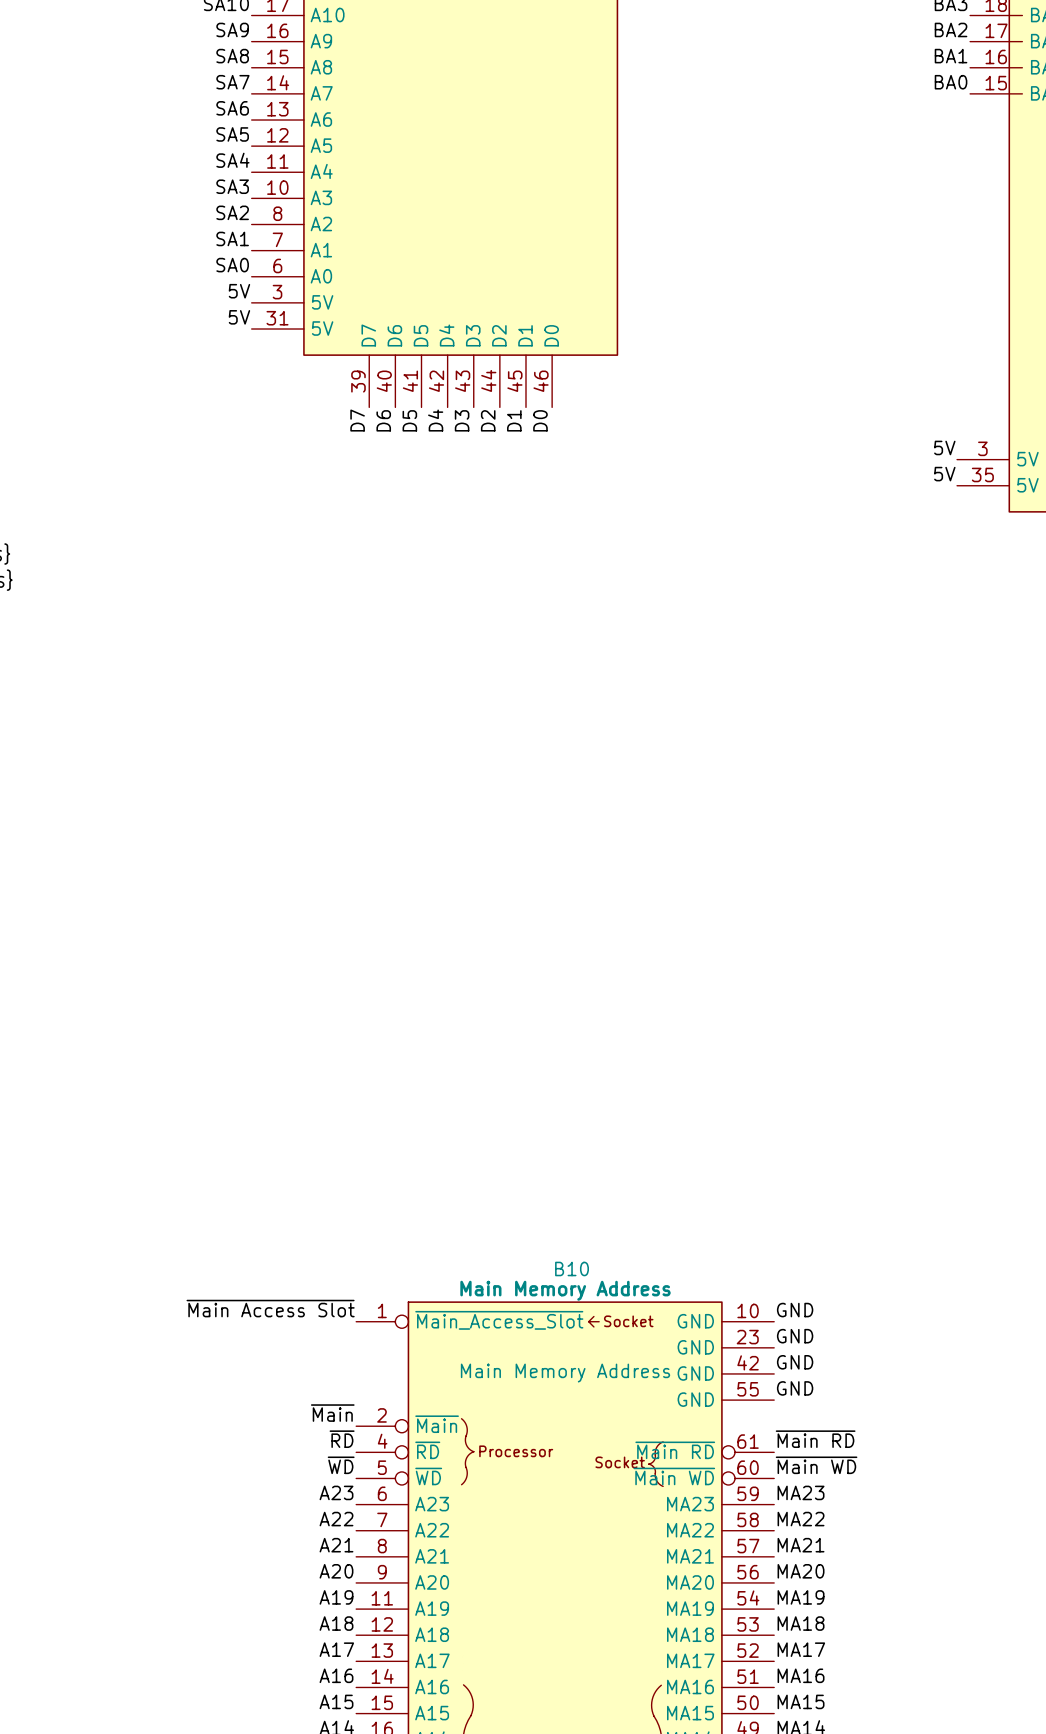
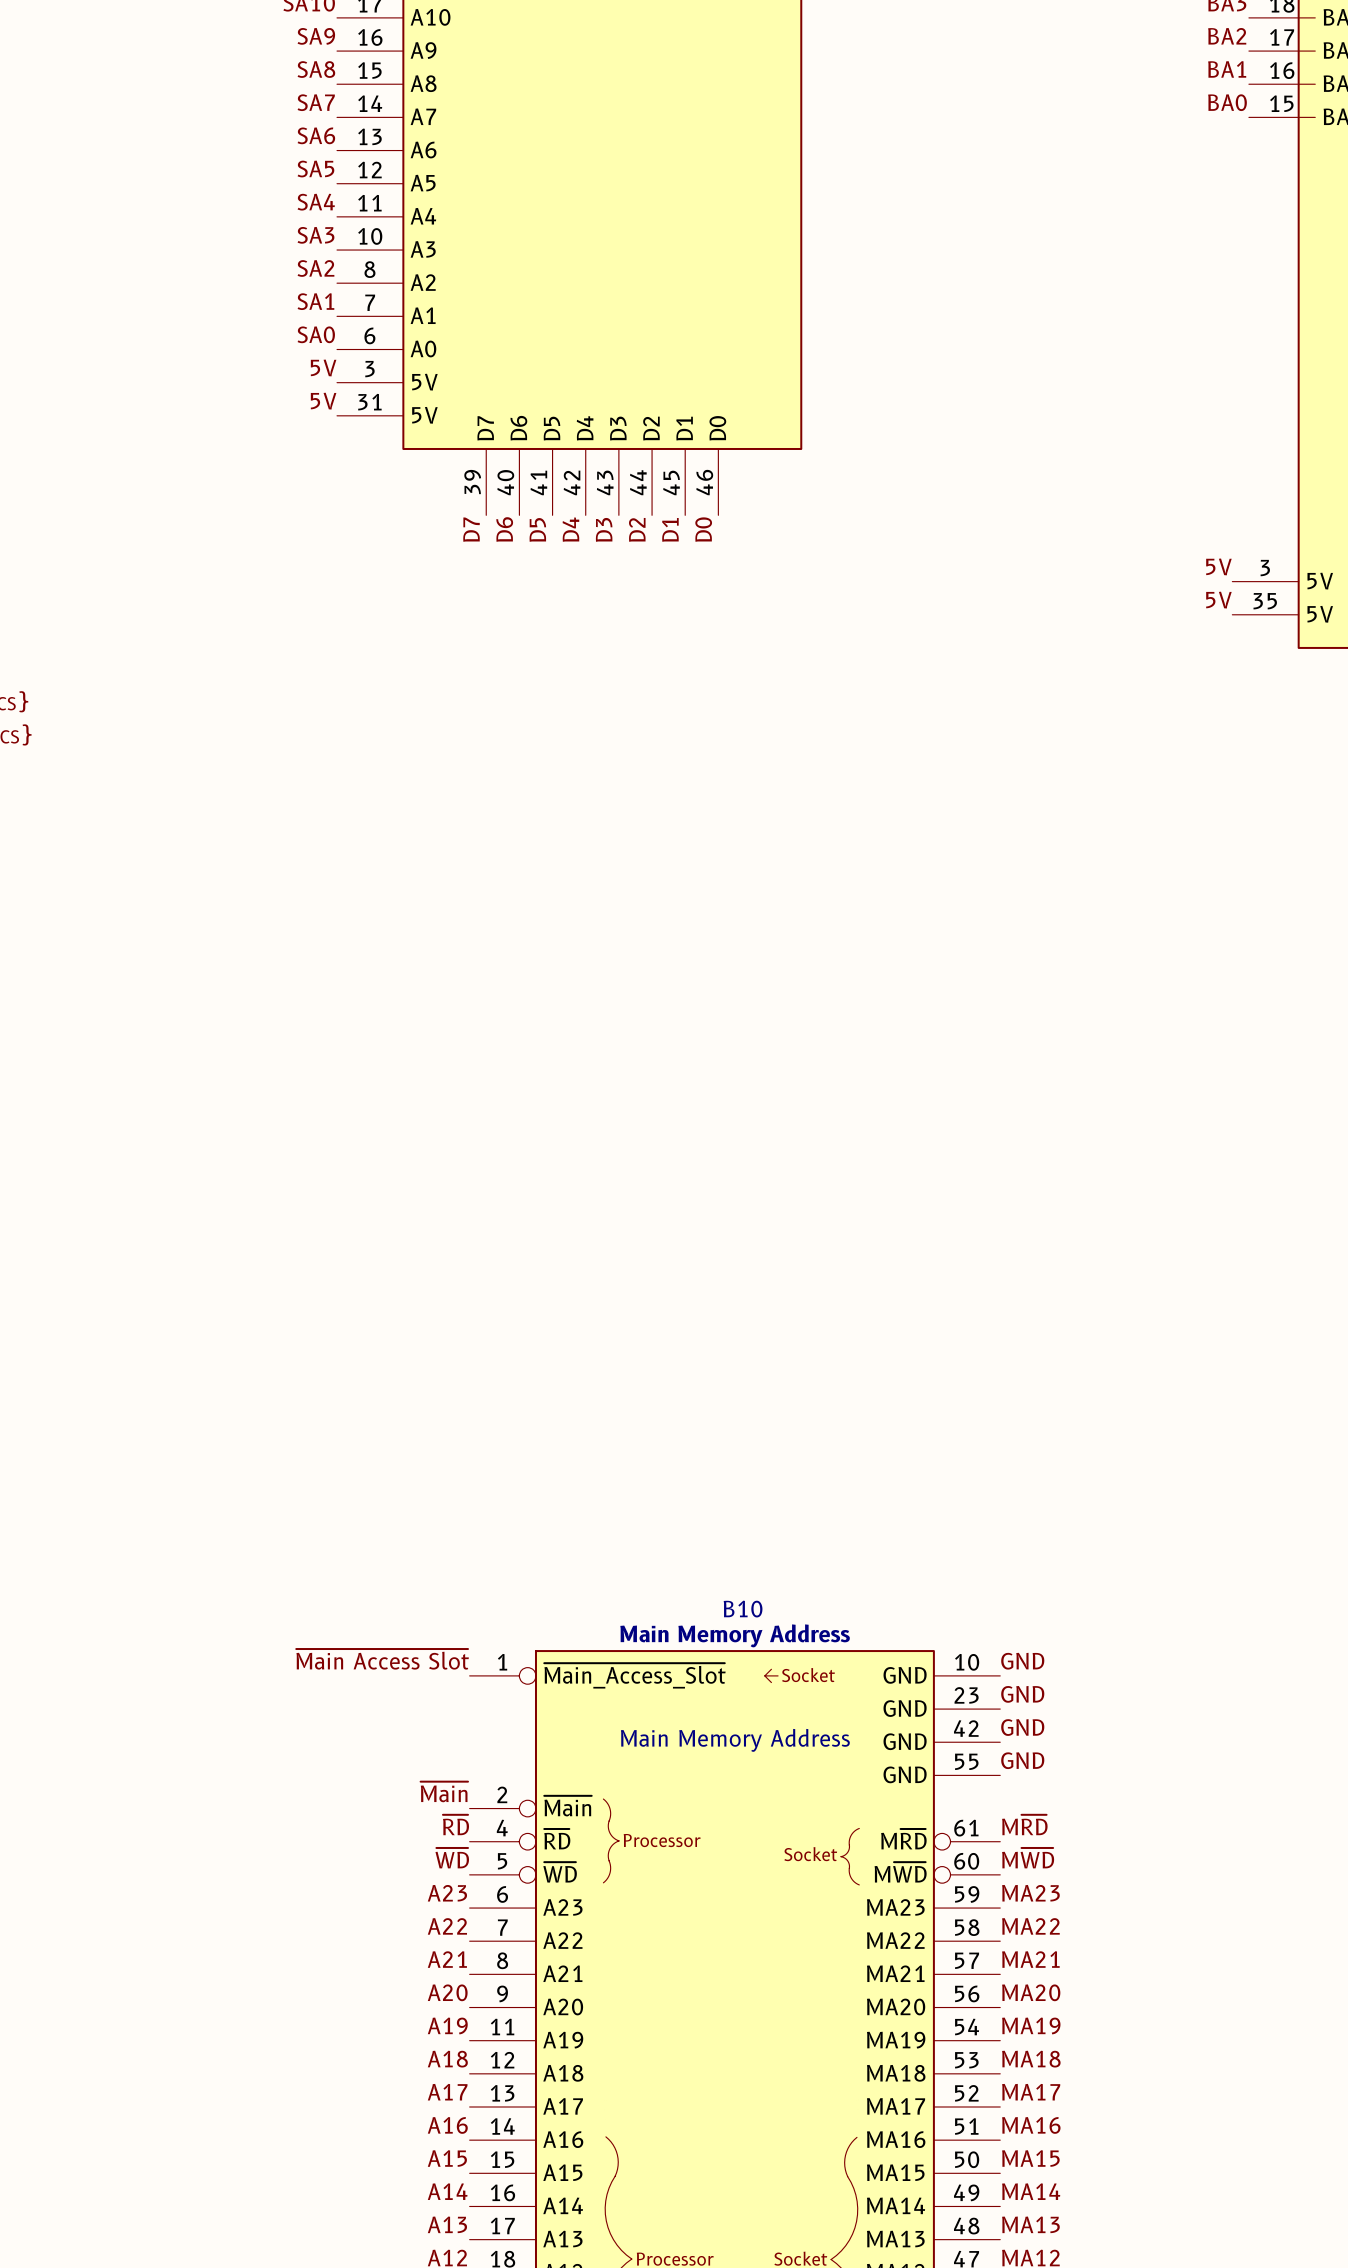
label: ~{Main RD} (815, 1439) -> M~{RD} (1024, 1825)
B10 pin name: ~{Main RD} (675, 1450) -> M~{RD} (903, 1839)
label: ~{Main WD} (816, 1465) -> M~{WD} (1028, 1858)
B10 pin name: ~{Main WD} (674, 1476) -> M~{WD} (900, 1872)

